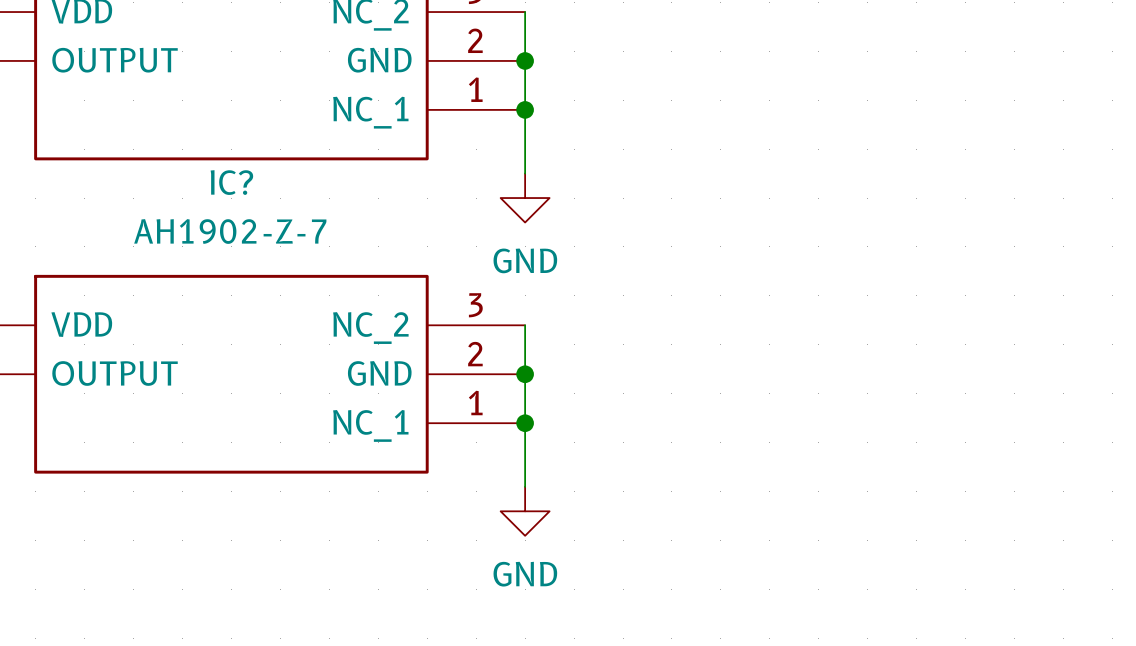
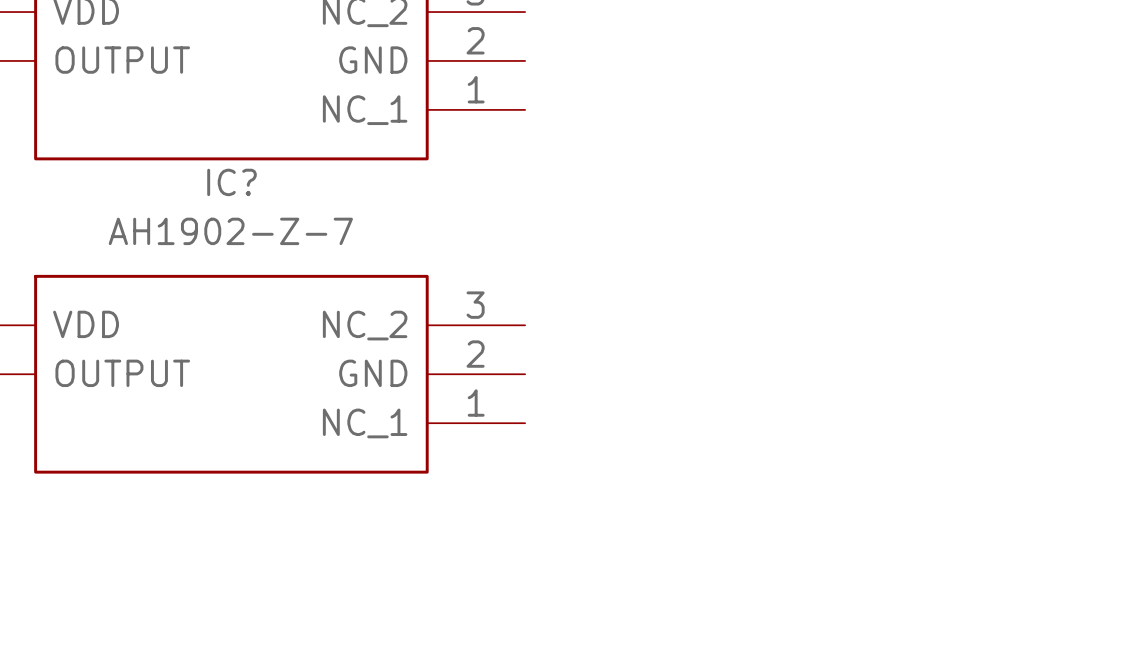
wire: (525, 12) (525, 173) -> none
junction: (525, 60) -> none
junction: (525, 109) -> none
power symbol: GND (525, 198) -> none
wire: (525, 325) (525, 486) -> none
junction: (525, 374) -> none
junction: (525, 423) -> none
power symbol: GND (525, 511) -> none

